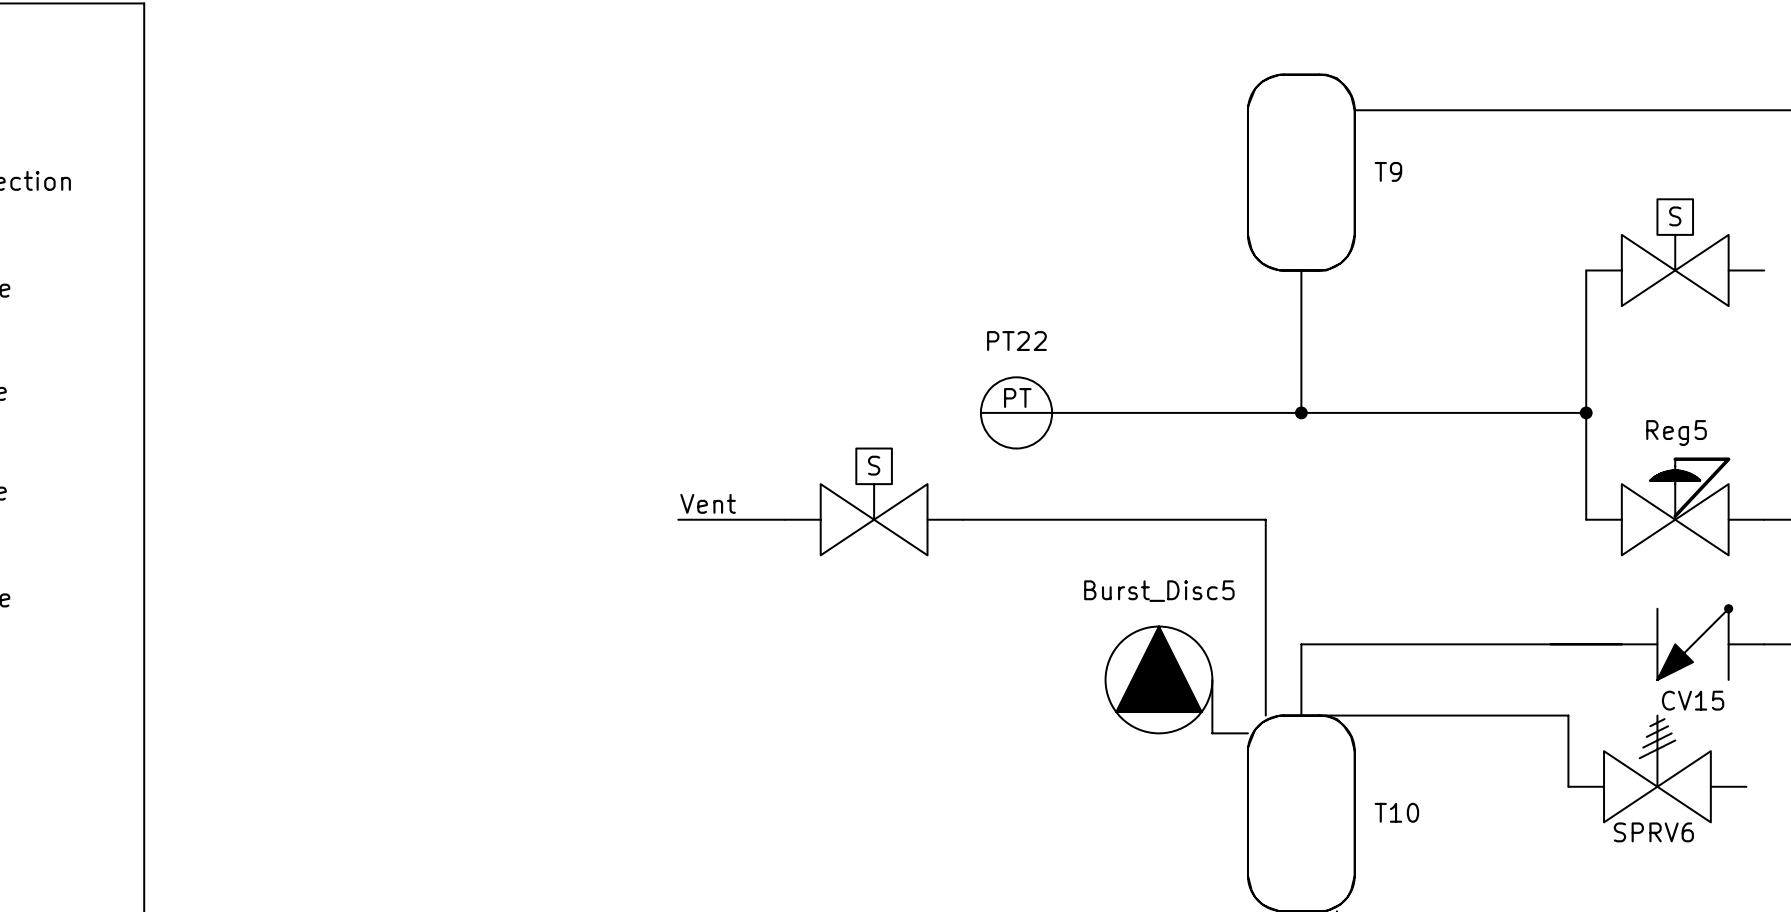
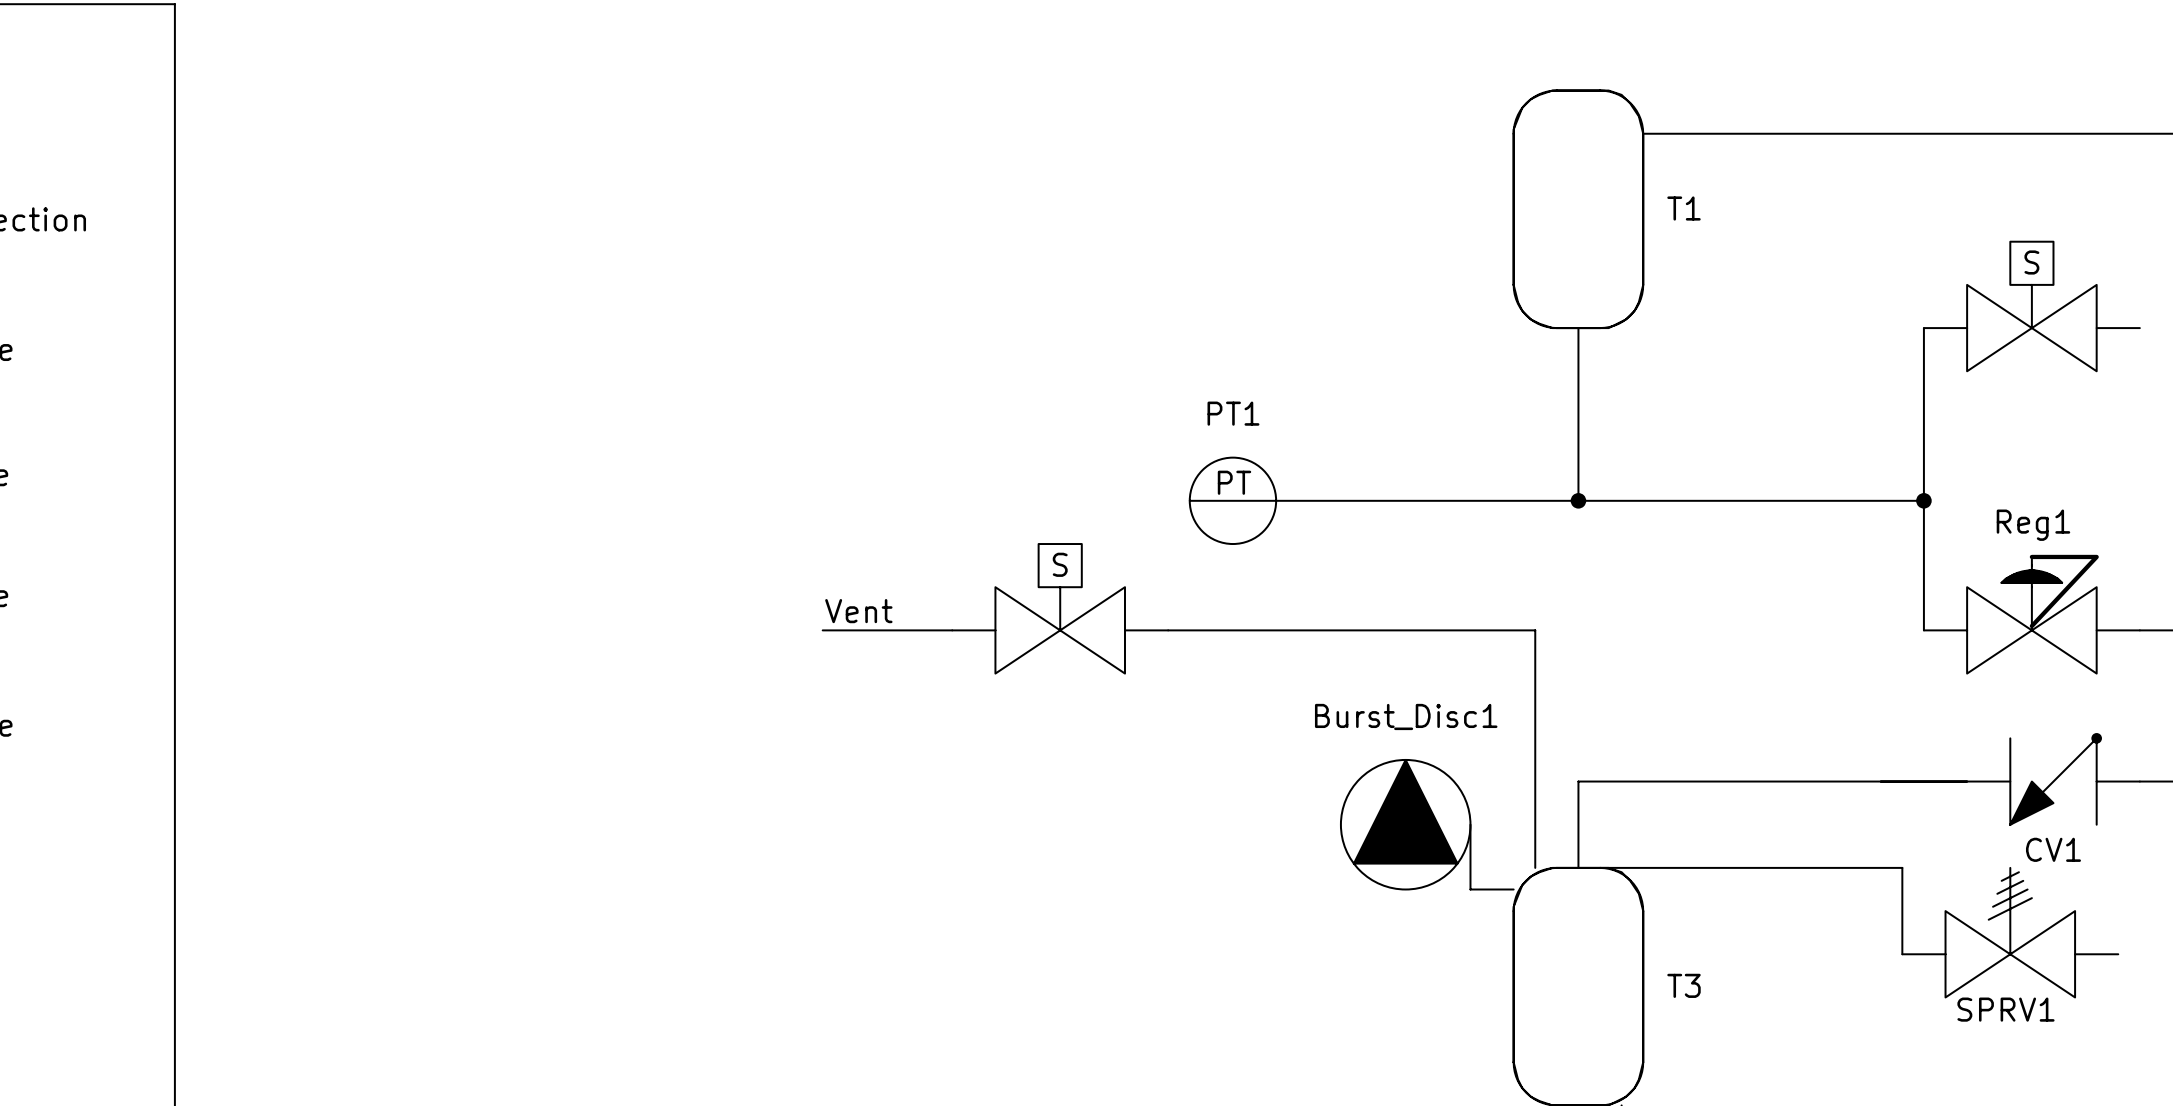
T9 name: T9 (1388, 171) -> T1 (1684, 208)
PT22 name: PT22 (1016, 341) -> PT1 (1233, 413)
Reg5 name: Reg5 (1676, 433) -> Reg1 (2033, 525)
Burst_Disc5 name: Burst_Disc5 (1159, 591) -> Burst_Disc1 (1406, 716)
CV15 name: CV15 (1693, 700) -> CV1 (2053, 849)
T10 name: T10 (1396, 812) -> T3 (1684, 985)
SPRV6 name: SPRV6 (1653, 832) -> SPRV1 (2005, 1009)

